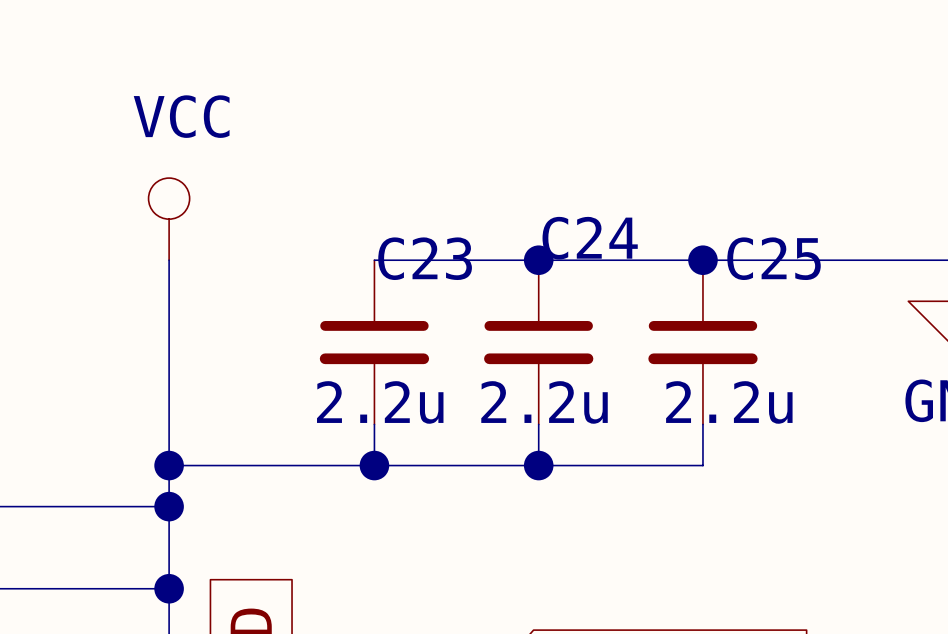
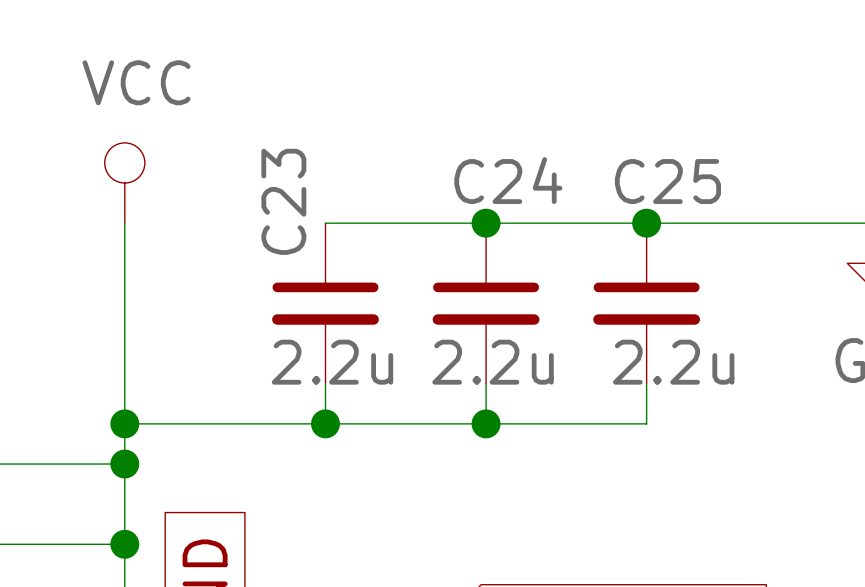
C24 name position: C24 (590, 238) -> C24 (508, 180)
C23 name rotation: 0° (425, 258) -> 90° counterclockwise (283, 201)
C25 name position: C25 (774, 258) -> C25 (667, 181)

